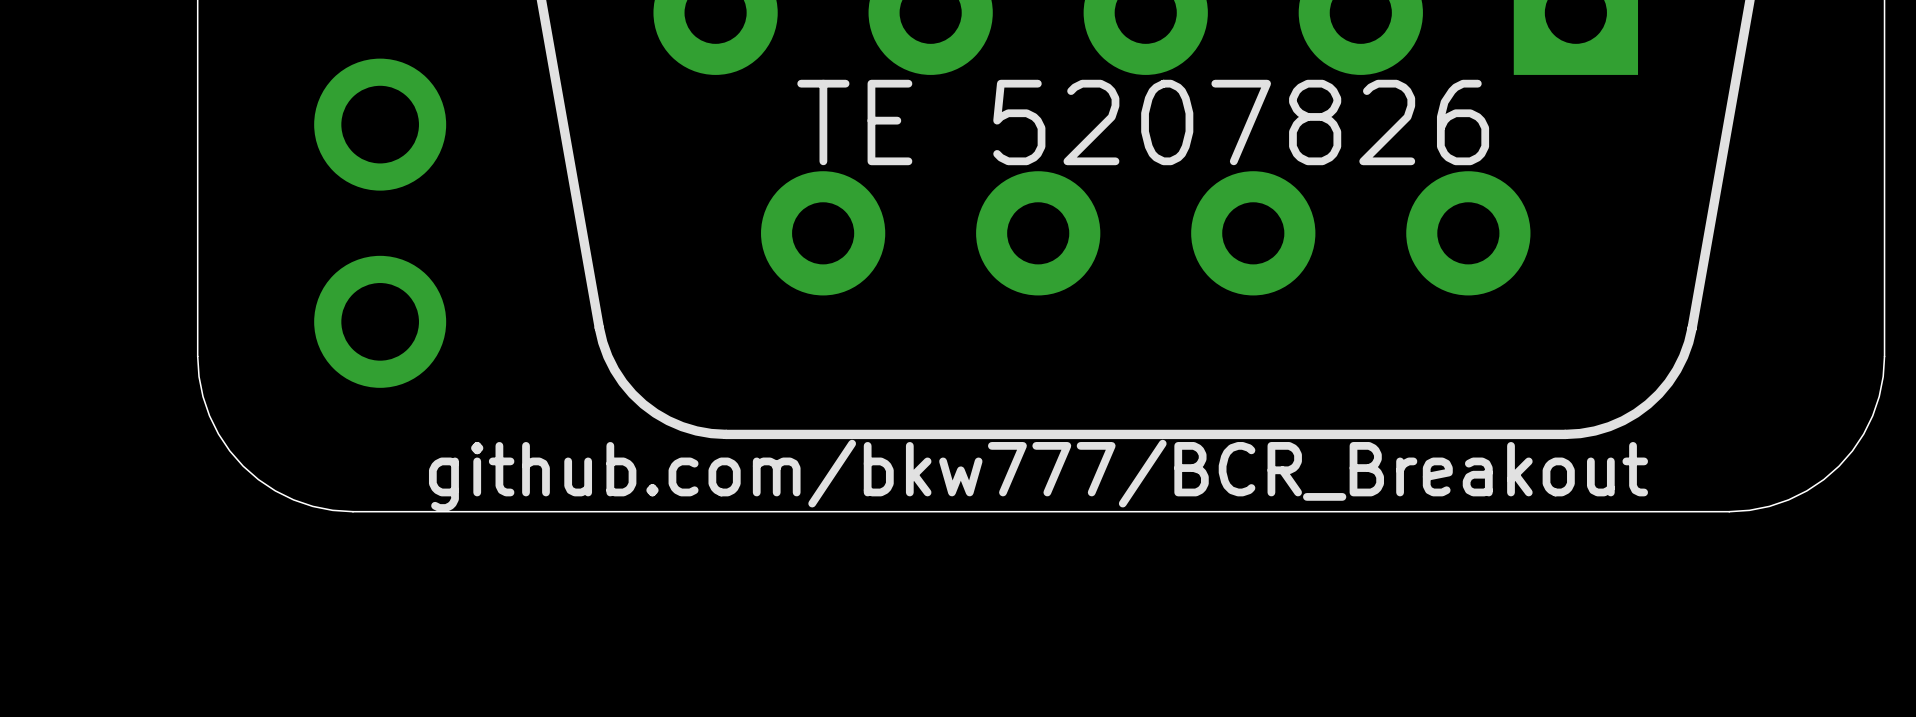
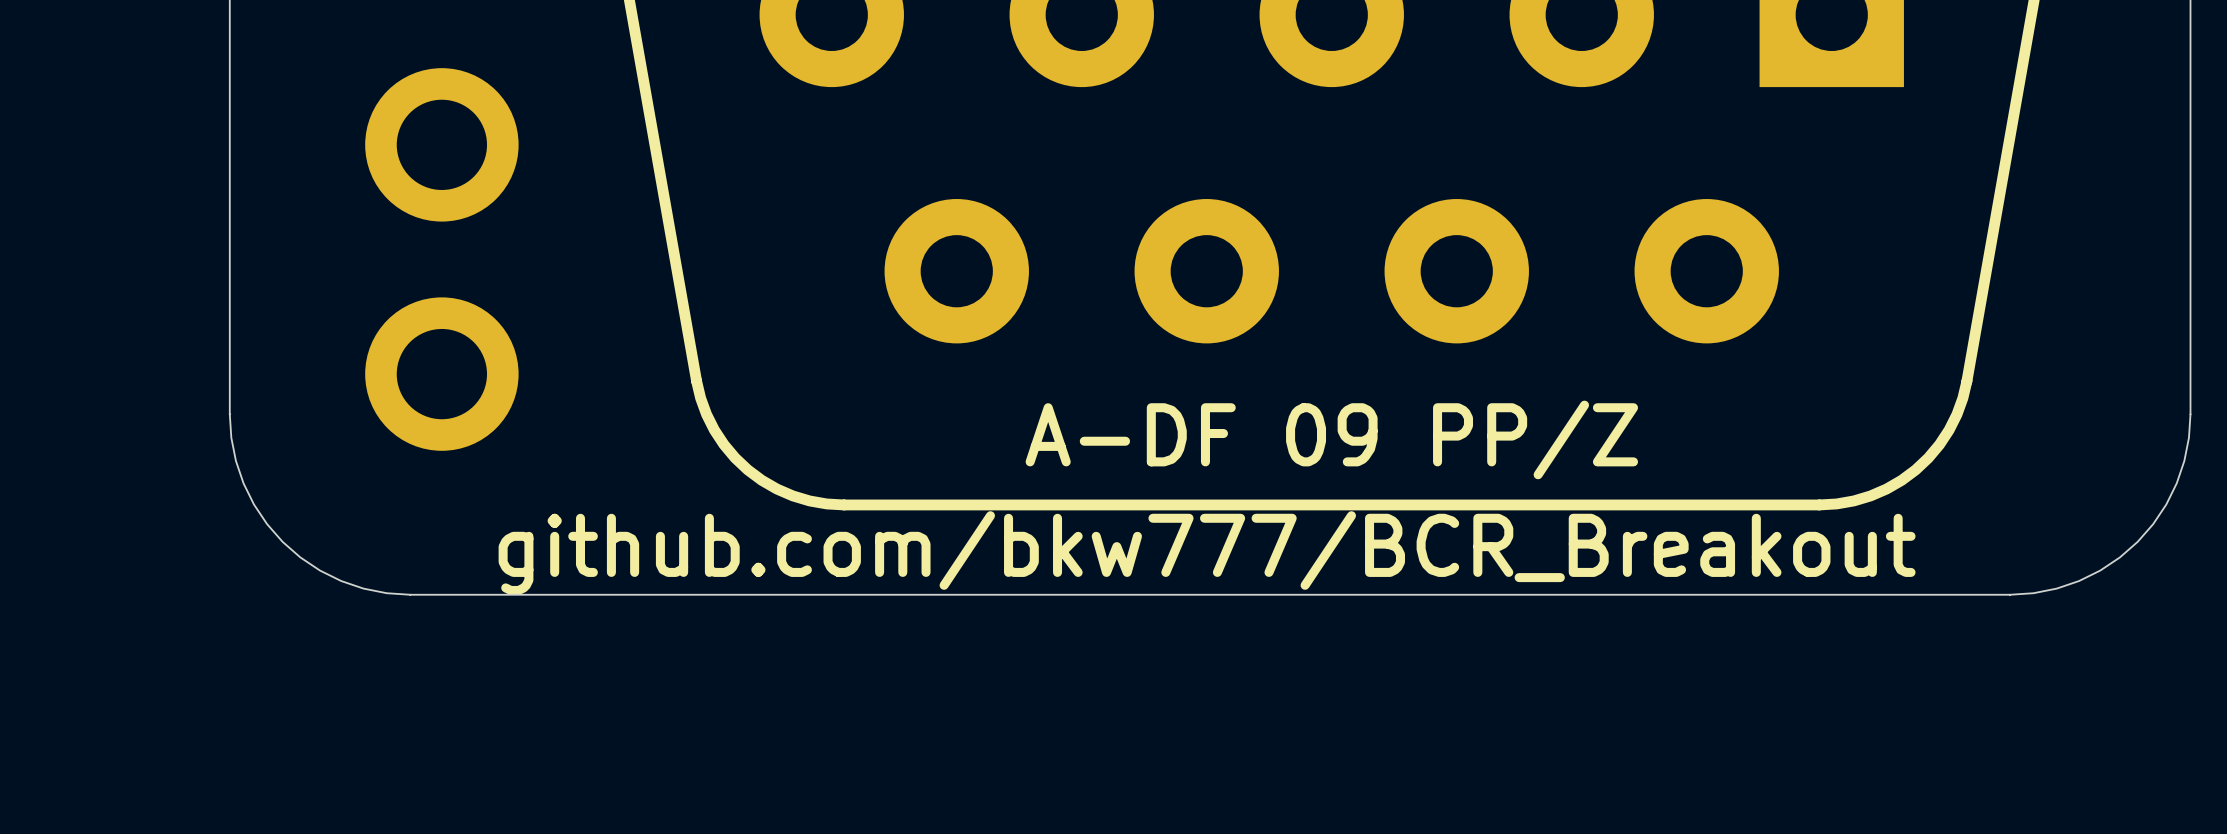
text: TE 5207826 (1143, 122) -> none
text: none -> A-DF 09 PP/Z (1331, 439)

